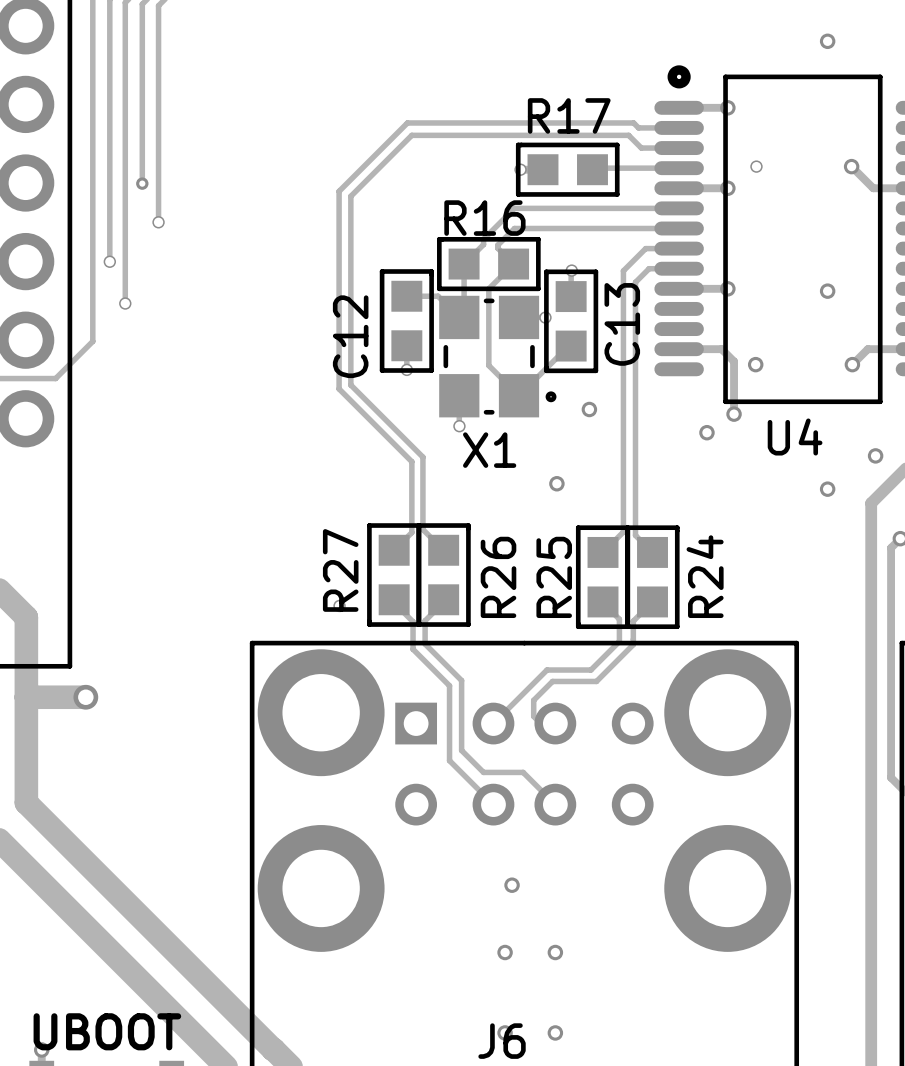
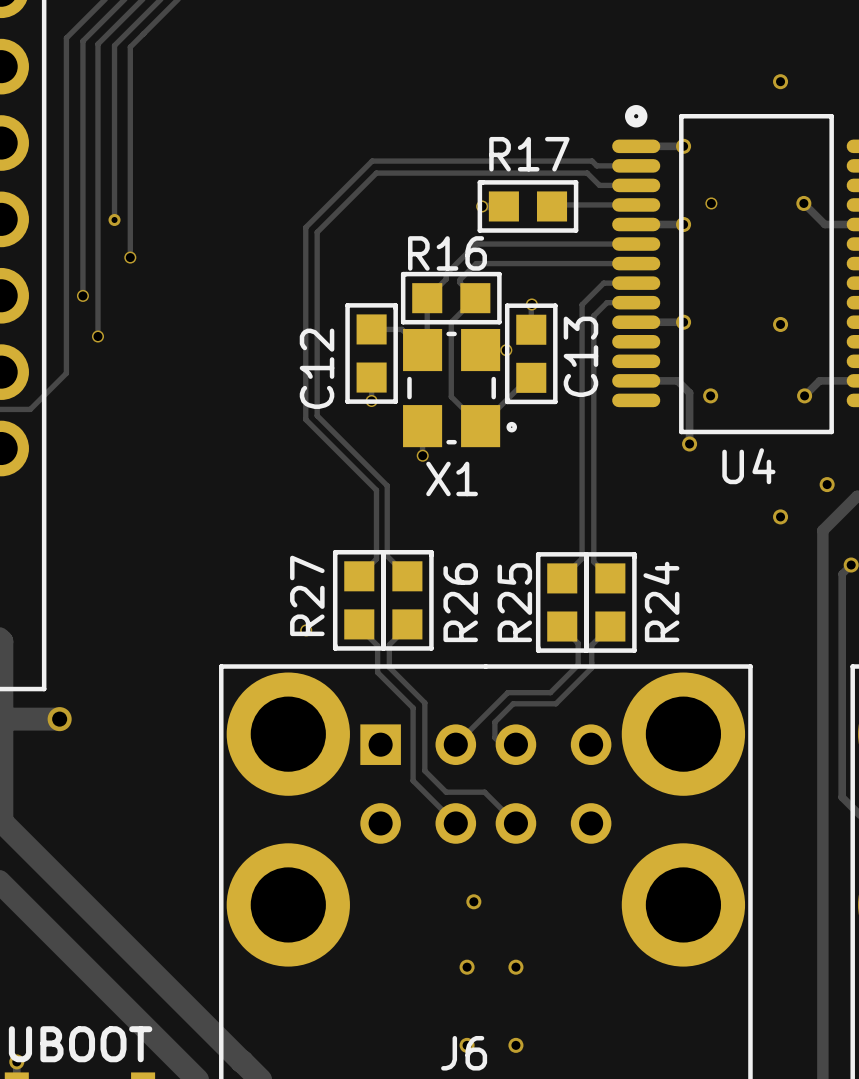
via: (589, 409) -> none
via: (706, 432) -> none
via: (556, 483) -> none

